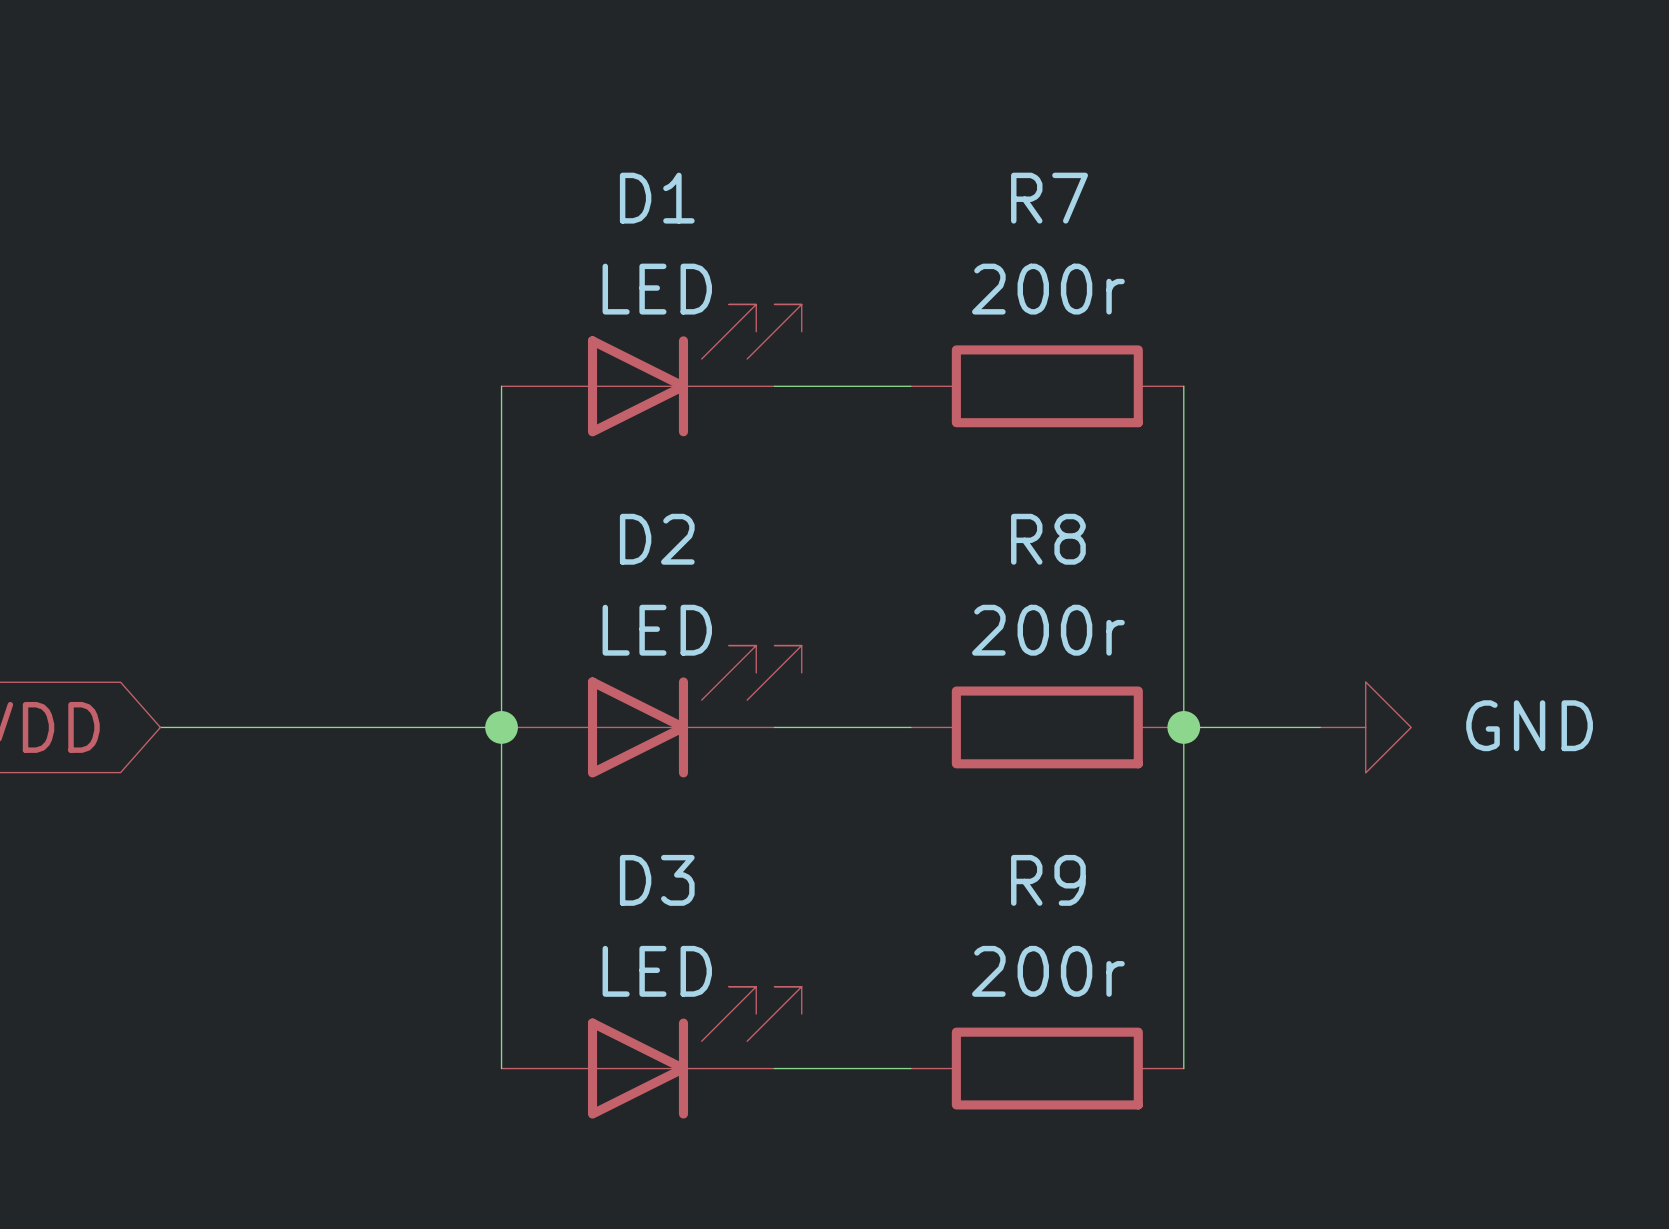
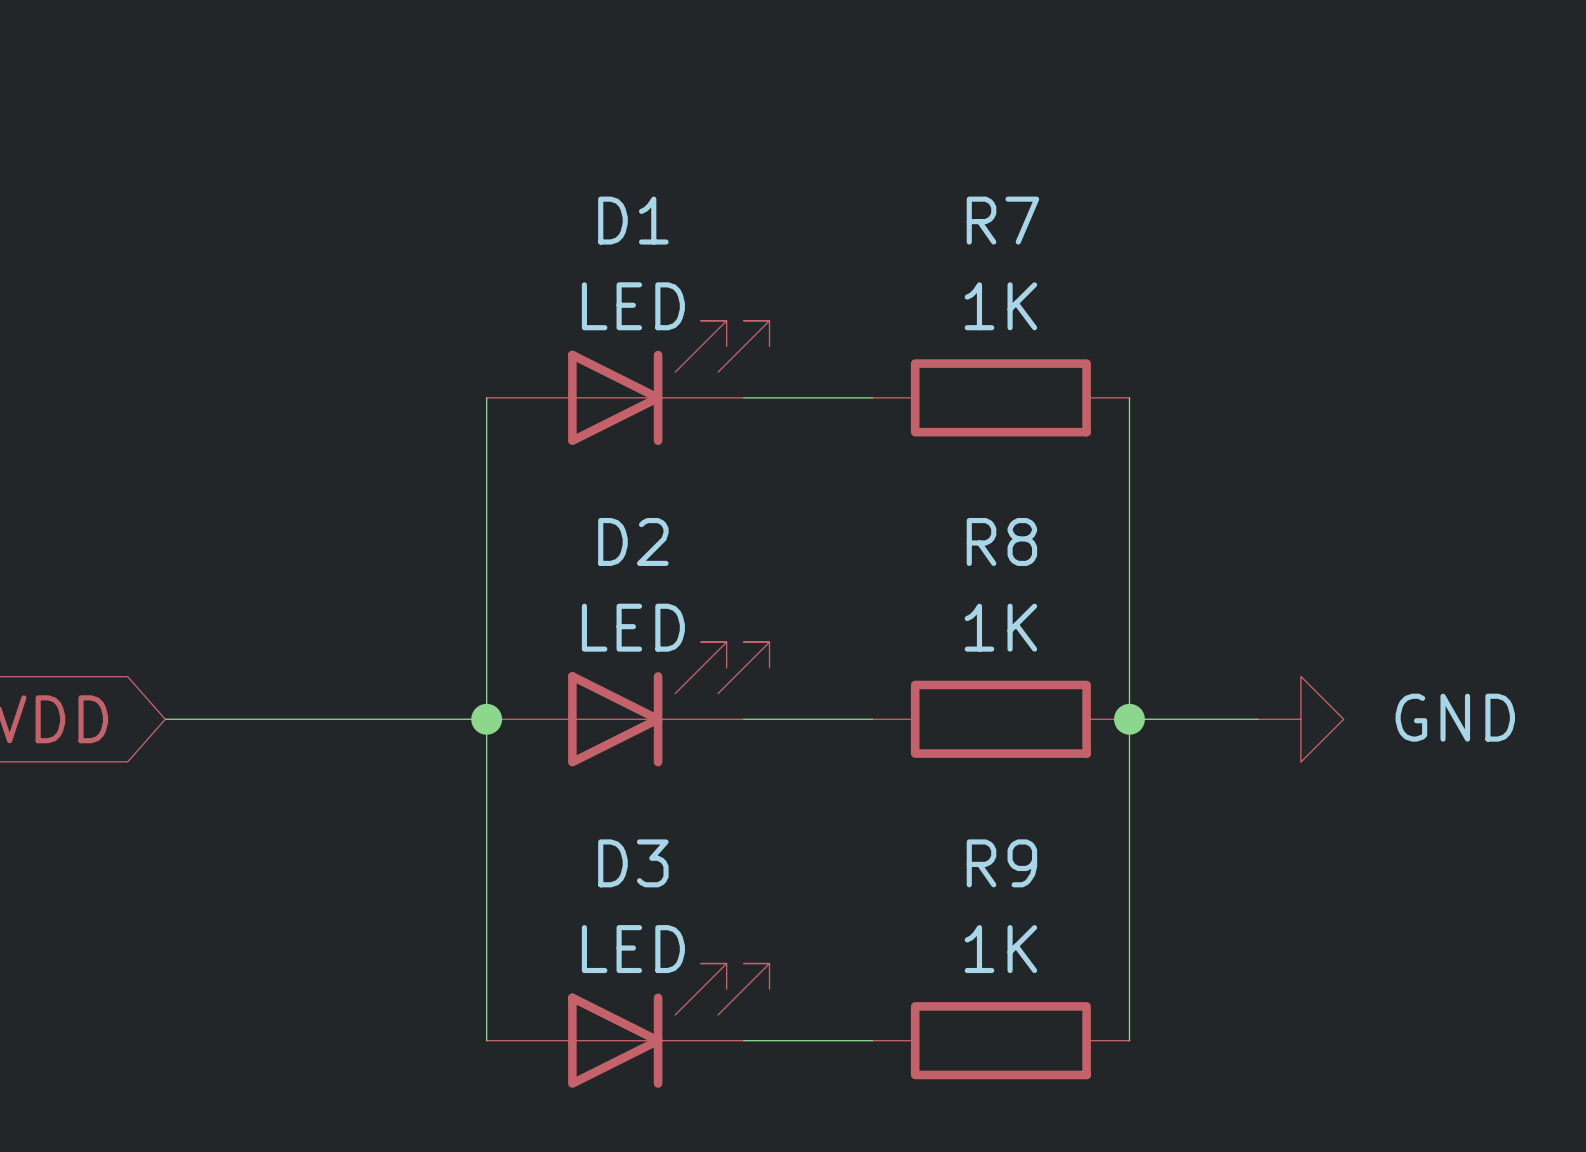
R7 value: 200r (1048, 289) -> 1K (1000, 306)
R8 value: 200r (1048, 630) -> 1K (1000, 627)
R9 value: 200r (1048, 971) -> 1K (1000, 949)

